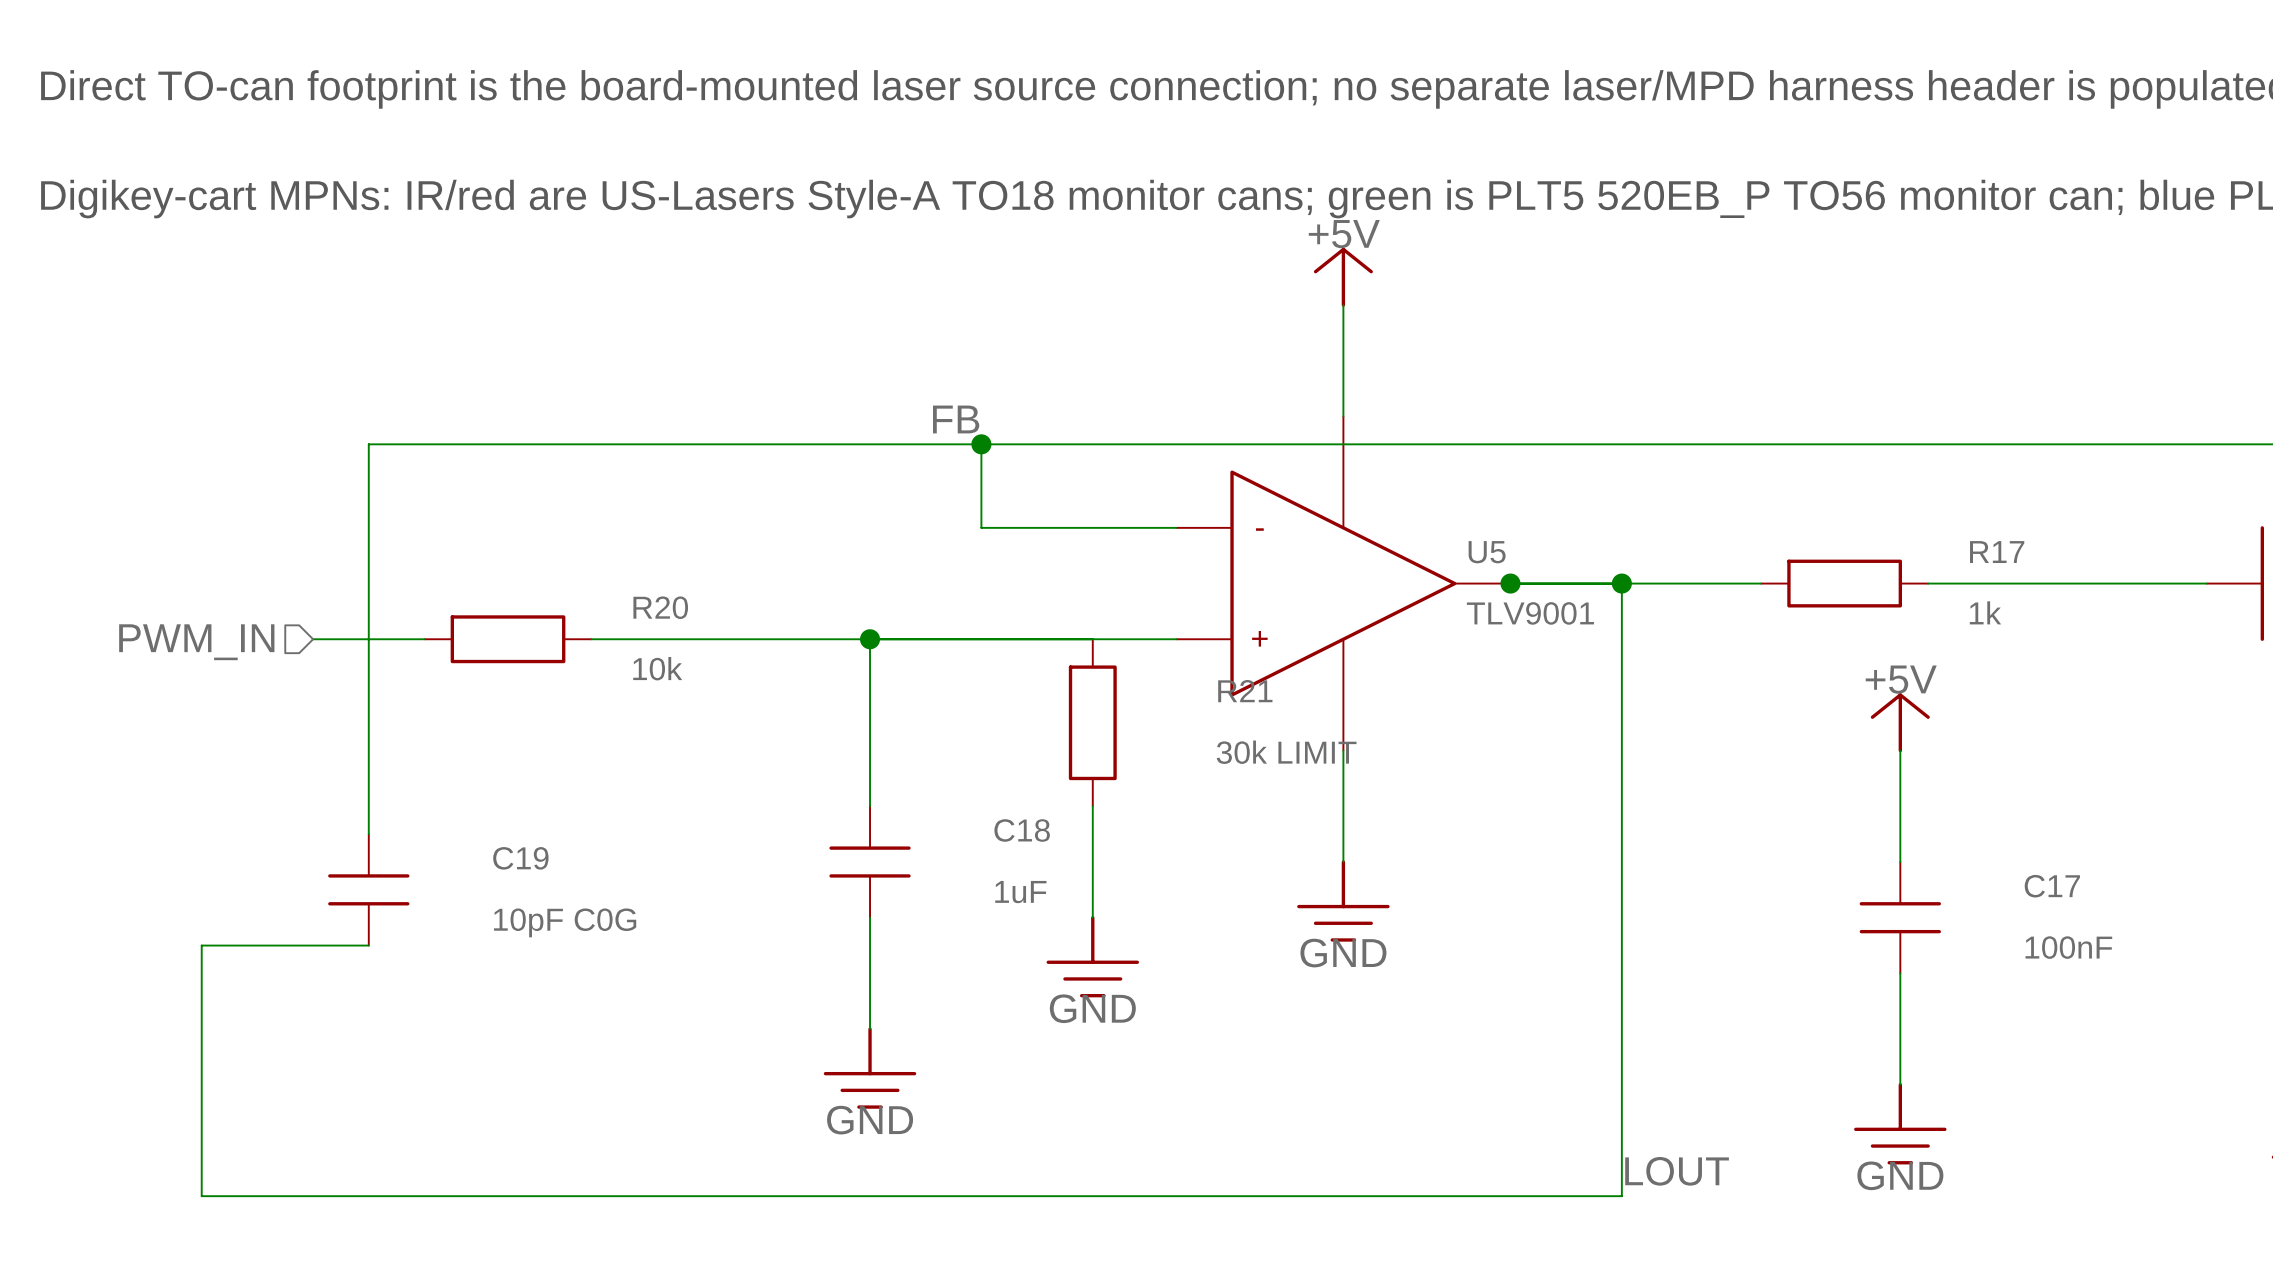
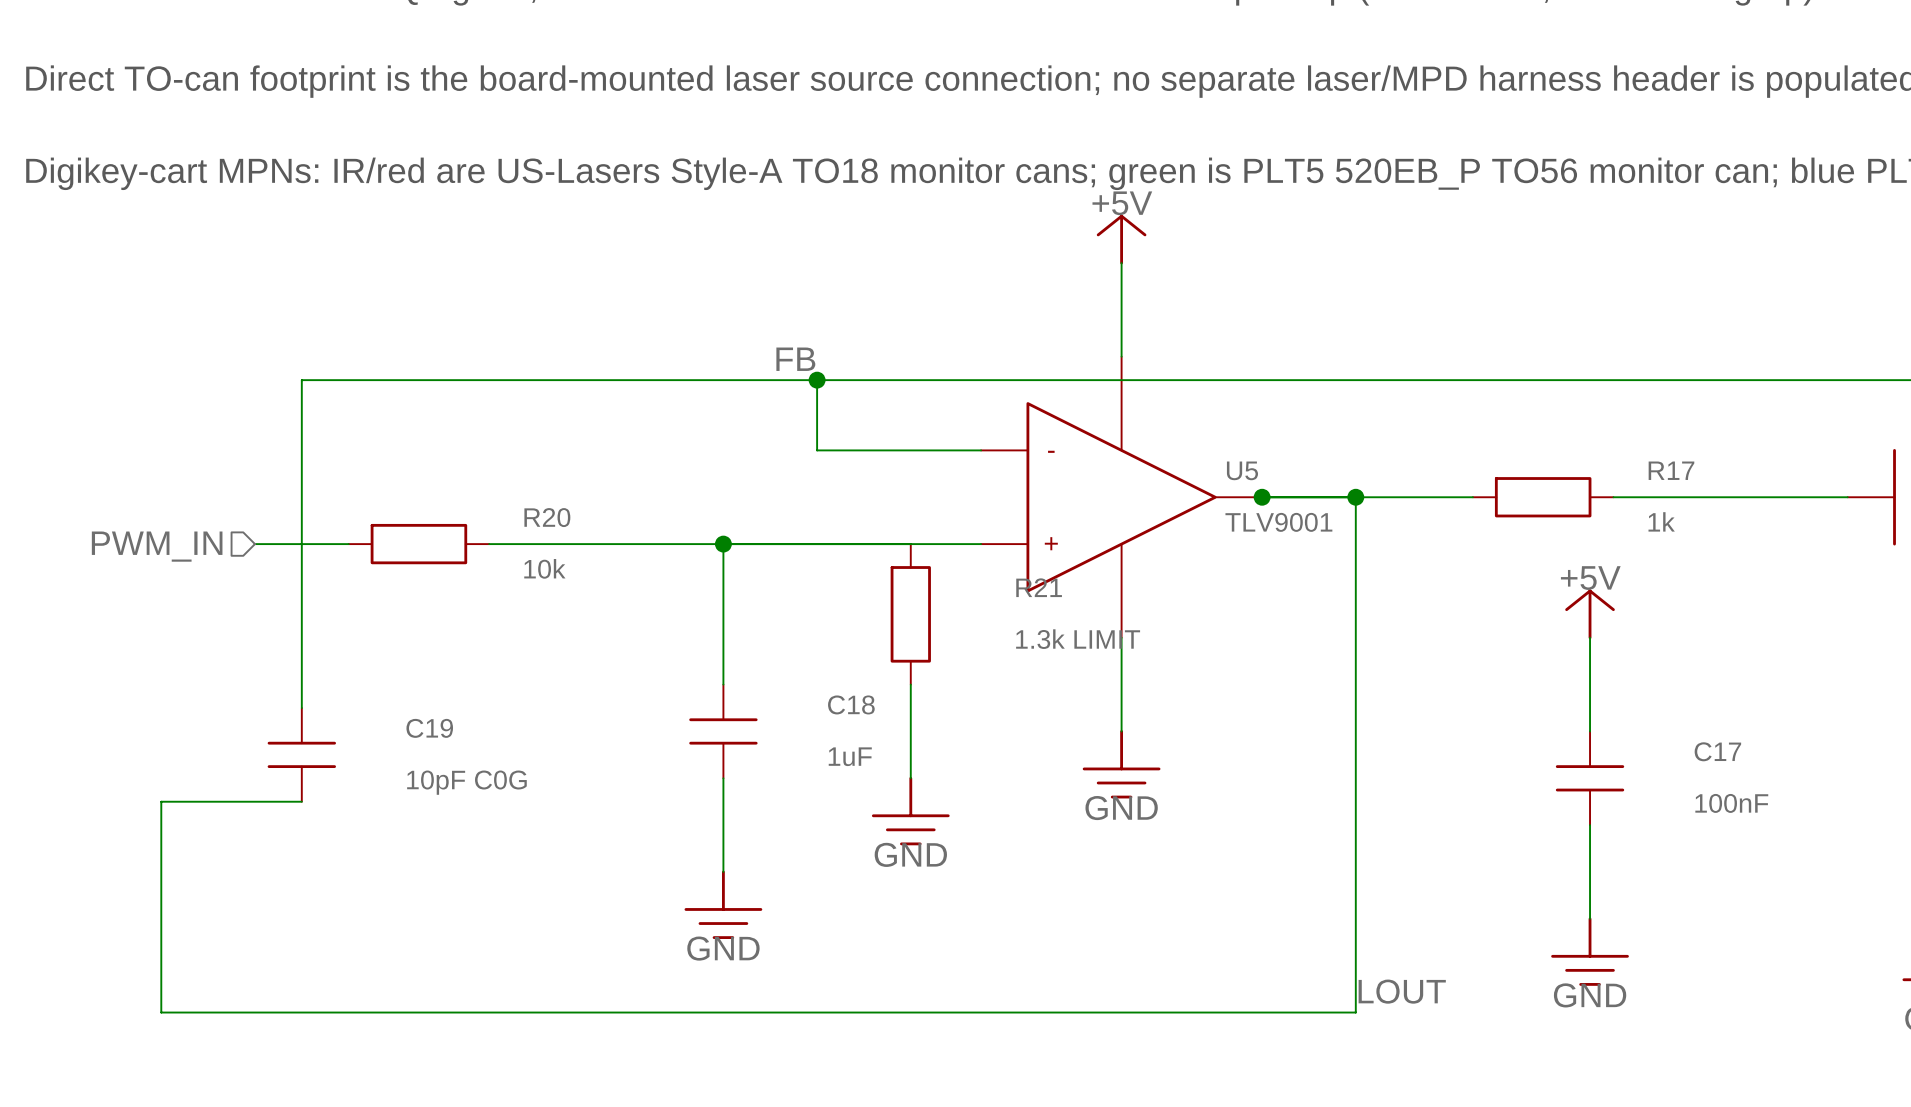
R21 value: 30k LIMIT (1286, 752) -> 1.3k LIMIT (1078, 639)

